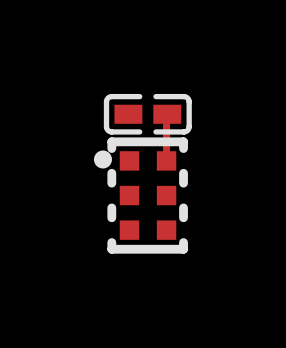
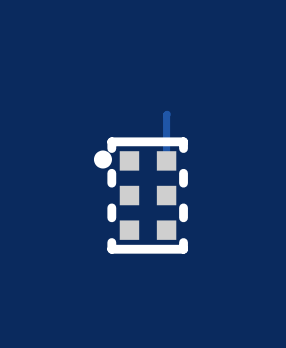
part: (147, 114) -> none

